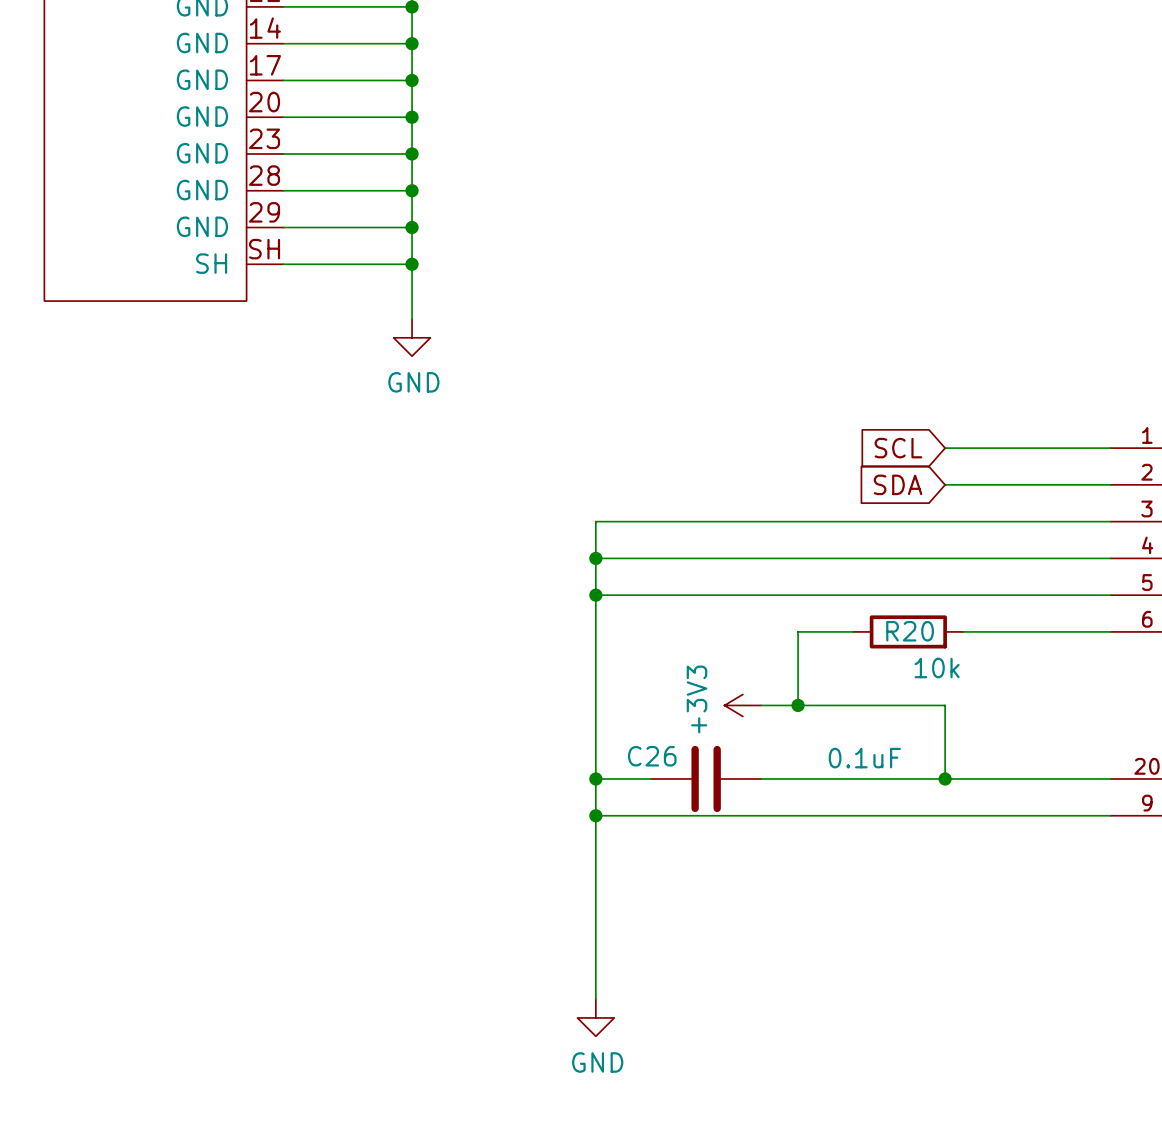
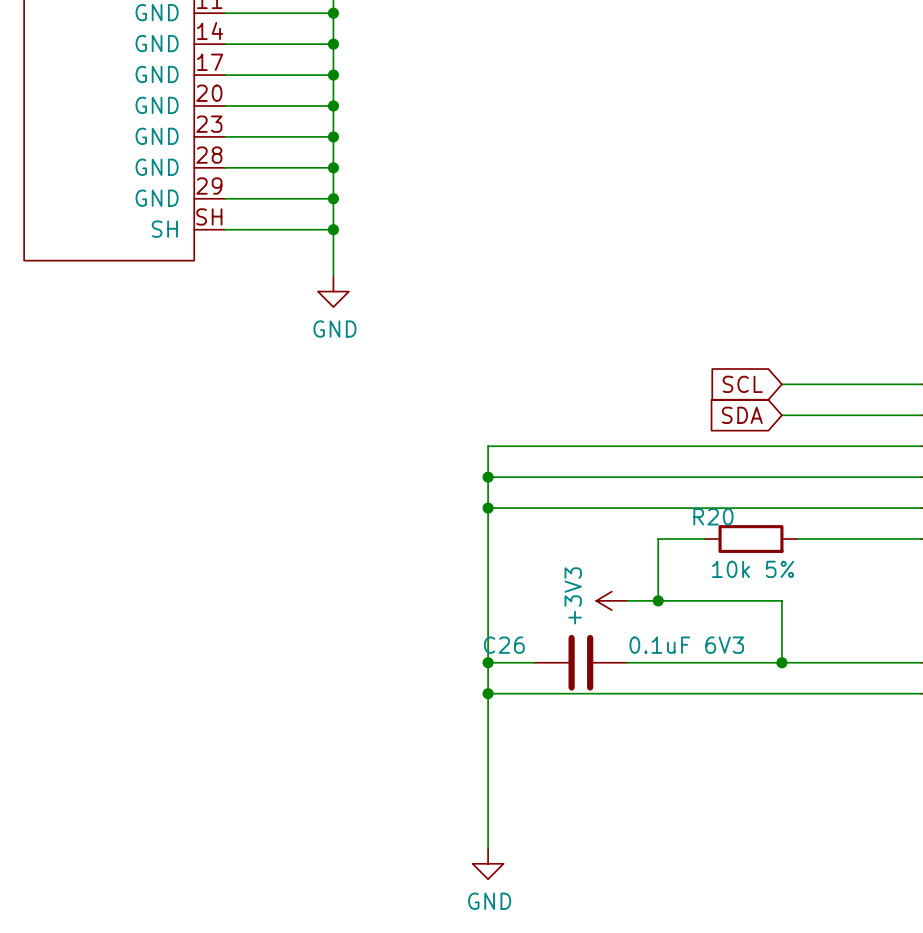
R20 name position: R20 (910, 631) -> R20 (713, 516)
R20 value: 10k (937, 668) -> 10k 5% (753, 569)
C26 name position: C26 (652, 756) -> C26 (504, 645)
C26 value: 0.1uF (864, 758) -> 0.1uF 6V3 (686, 645)

